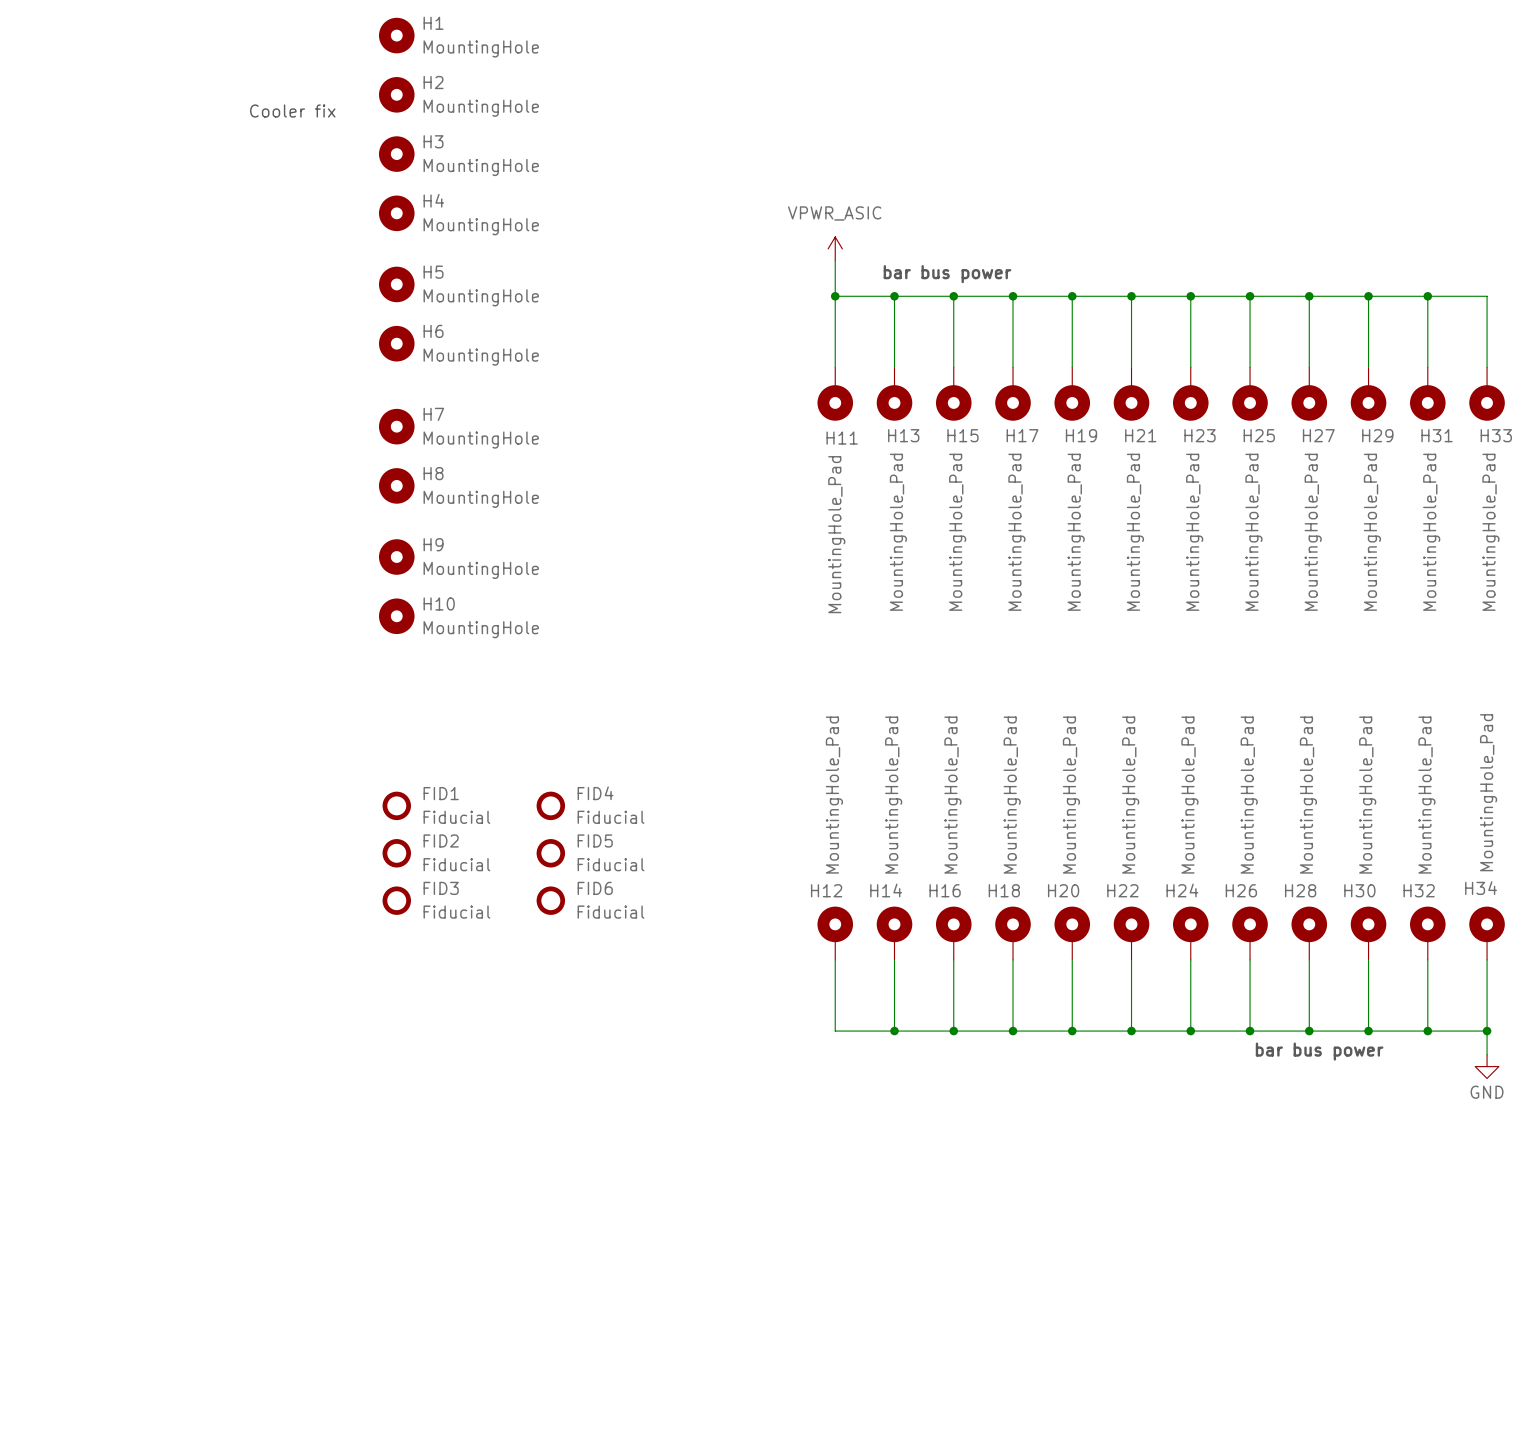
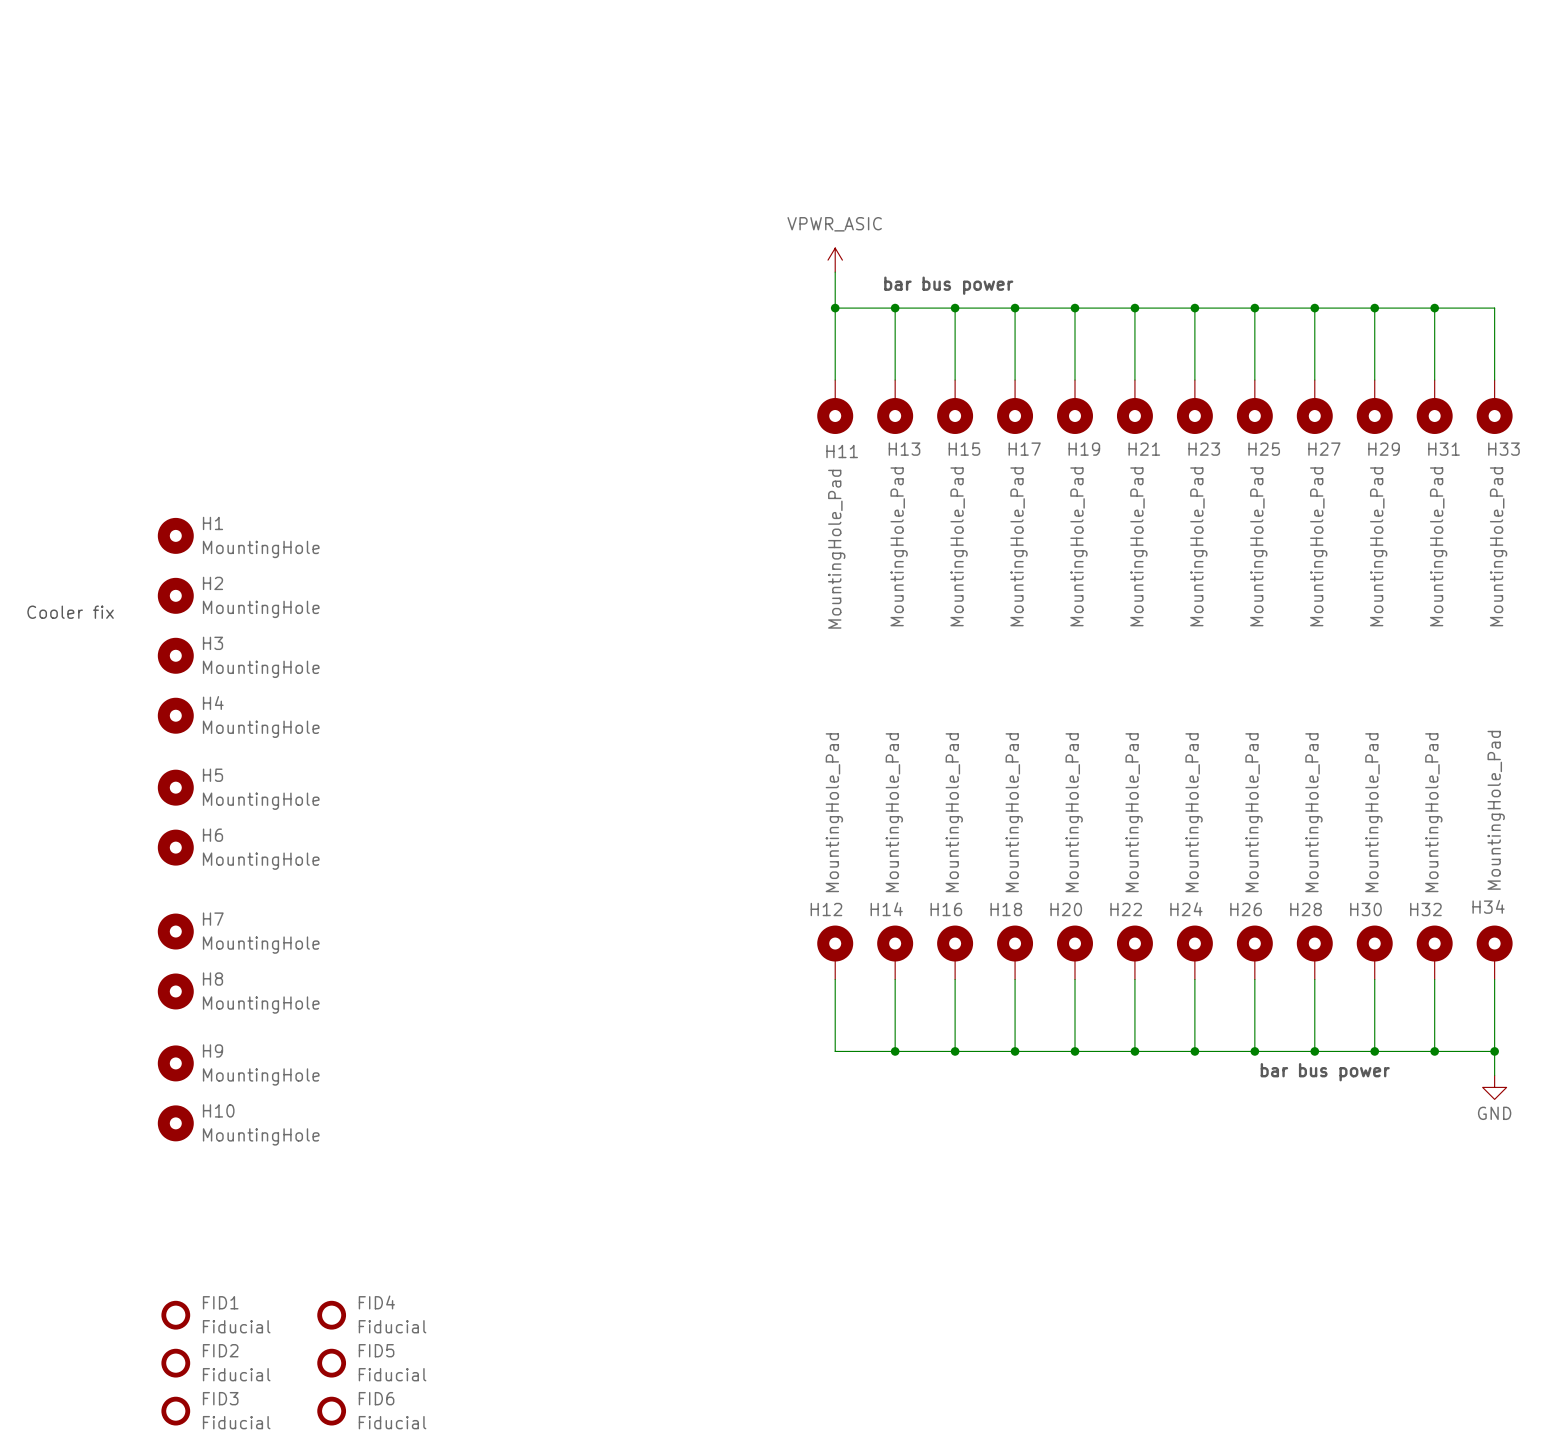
H1 position: (396, 35) -> (175, 535)
H2 position: (396, 94) -> (175, 595)
text: Cooler fix (292, 111) -> none
H3 position: (396, 154) -> (175, 655)
H4 position: (396, 213) -> (175, 715)
H5 position: (396, 284) -> (175, 787)
H6 position: (396, 343) -> (175, 847)
H7 position: (396, 426) -> (175, 931)
H8 position: (396, 485) -> (175, 991)
H9 position: (396, 557) -> (175, 1063)
text: none -> Cooler fix (70, 612)
H10 position: (396, 616) -> (175, 1123)
FID1 position: (396, 805) -> (175, 1315)
FID4 position: (550, 805) -> (331, 1315)
FID2 position: (396, 853) -> (175, 1363)
FID5 position: (550, 853) -> (331, 1363)
FID3 position: (396, 900) -> (175, 1411)
FID6 position: (550, 900) -> (331, 1411)

